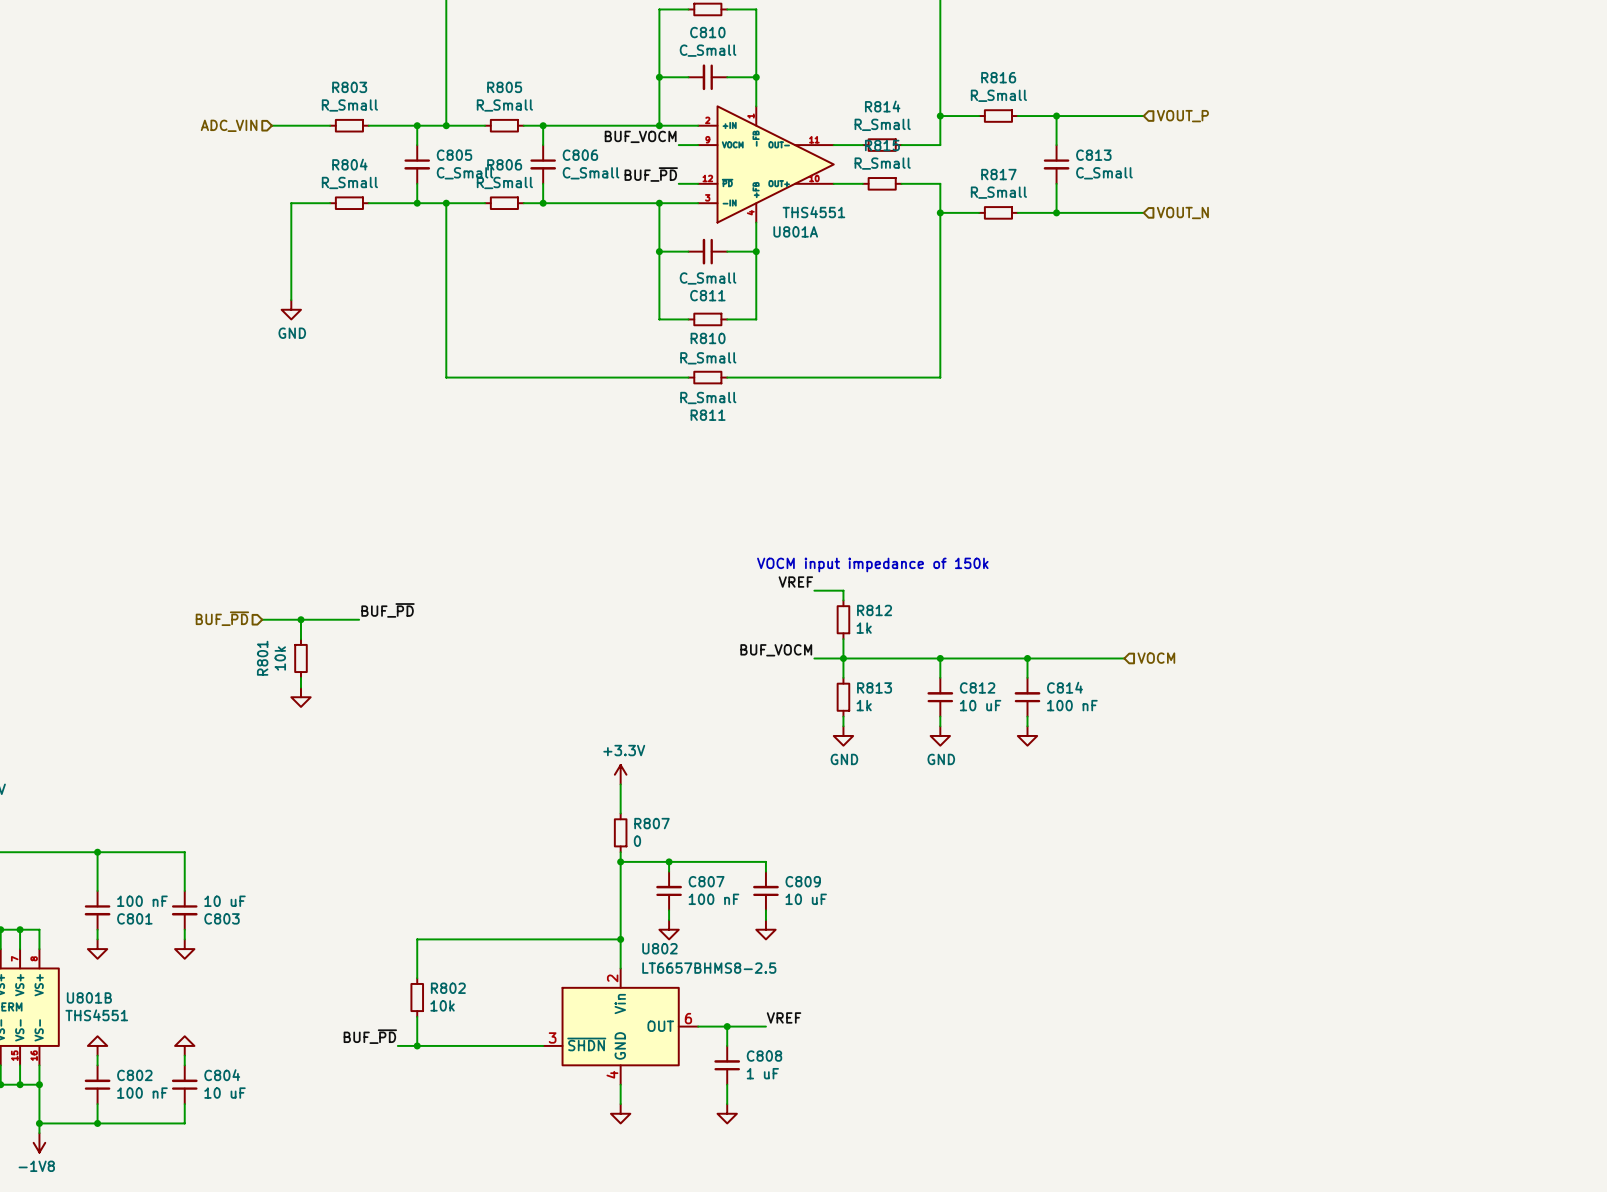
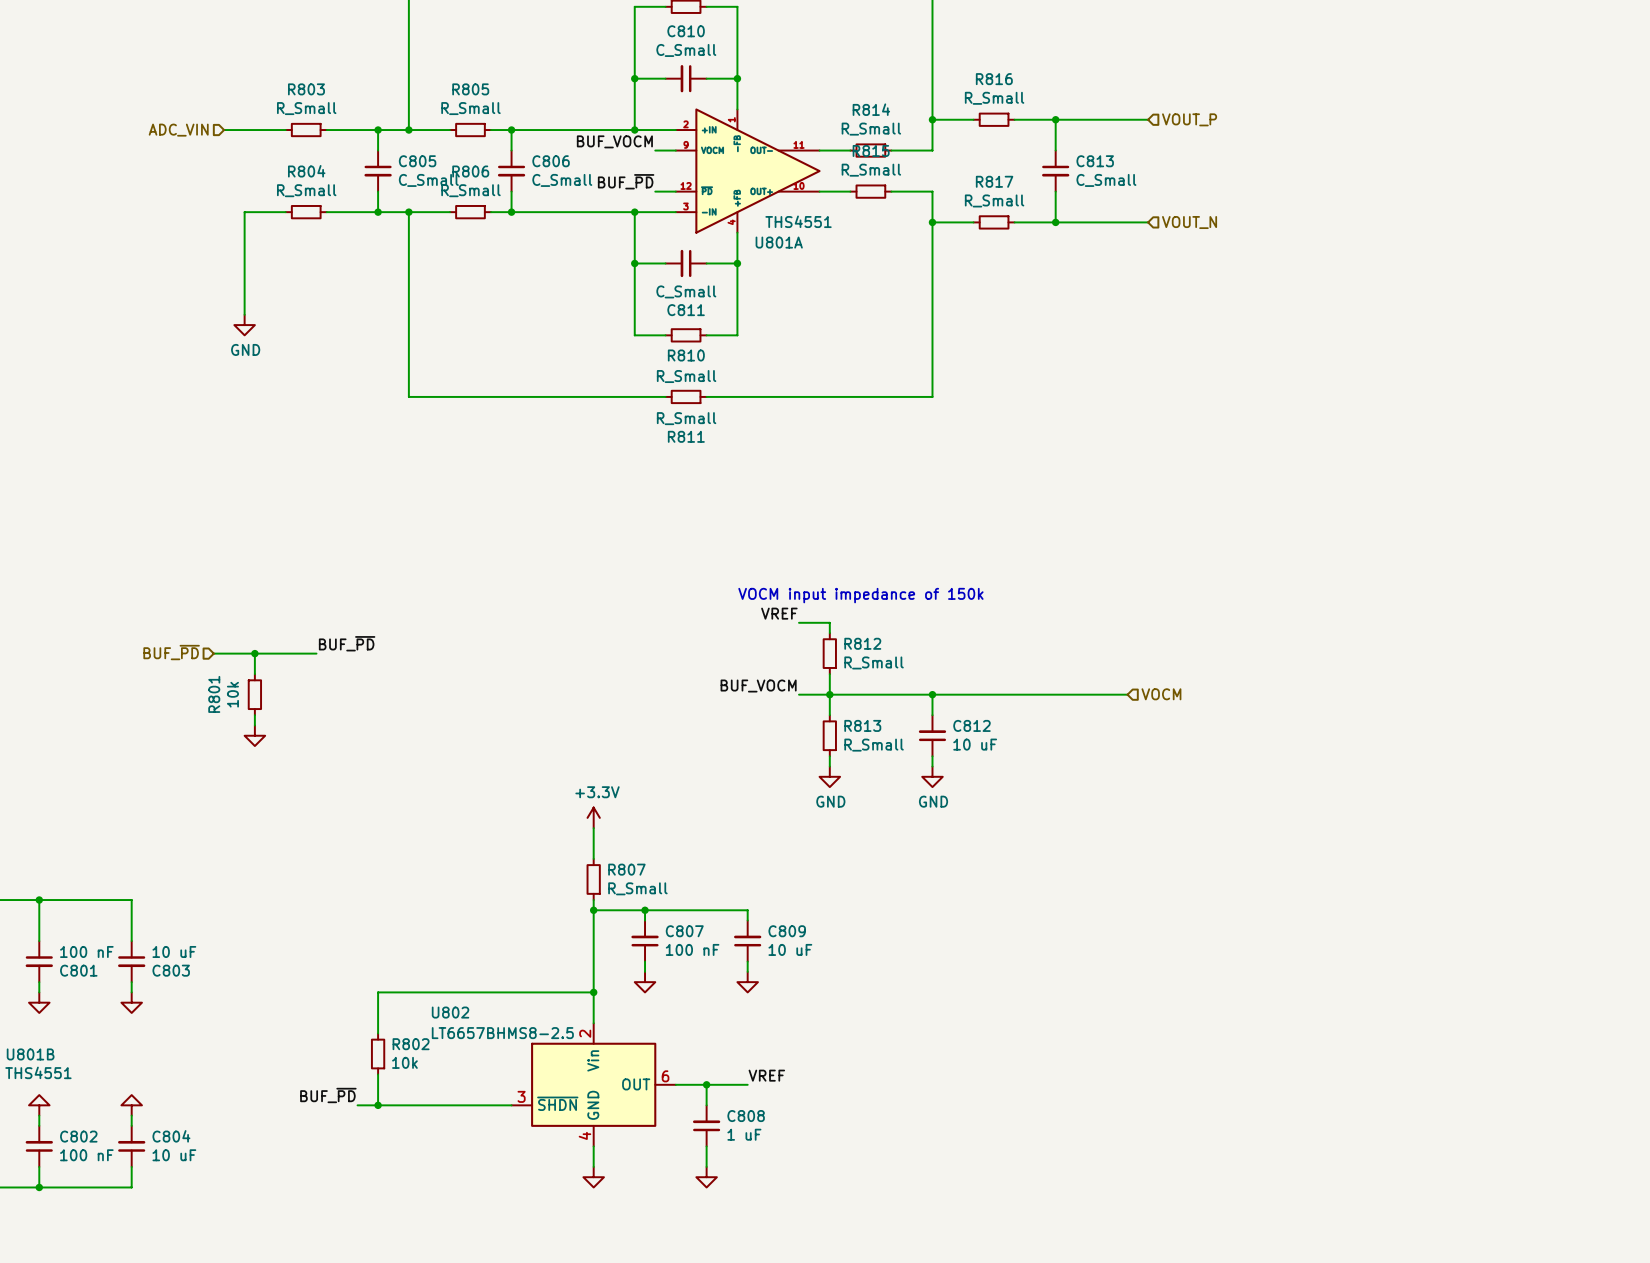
R812 value: 1k (864, 628) -> R_Small (874, 662)
wire: (1027, 658) (1027, 677) -> none
junction: (1027, 658) -> none
C814: 100 nF (1027, 697) -> none
R813 value: 1k (864, 705) -> R_Small (874, 745)
wire: (1027, 716) (1027, 726) -> none
power symbol: (1027, 735) -> none
R807 value: 0 (637, 841) -> R_Small (637, 888)
U802 name position: U802 (659, 948) -> U802 (450, 1012)
U802 value position: LT6657BHMS8-2.5 (709, 968) -> LT6657BHMS8-2.5 (502, 1033)

